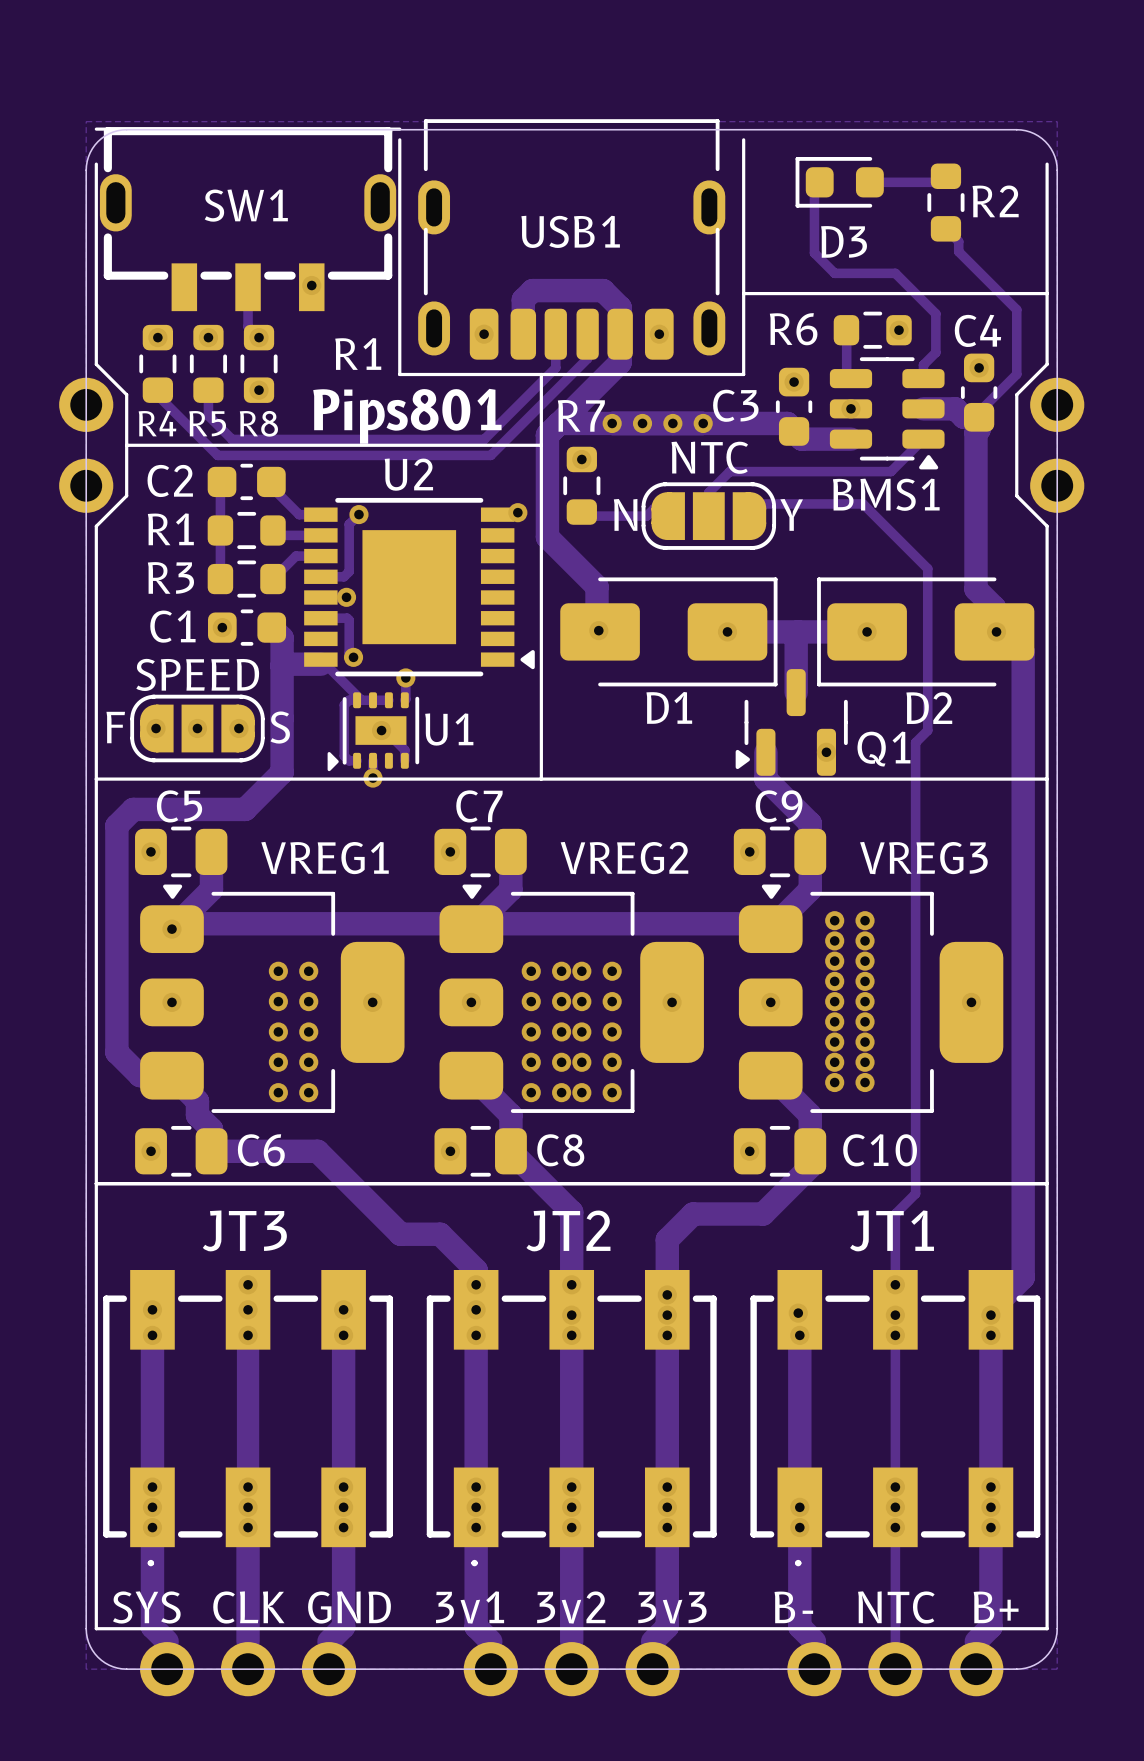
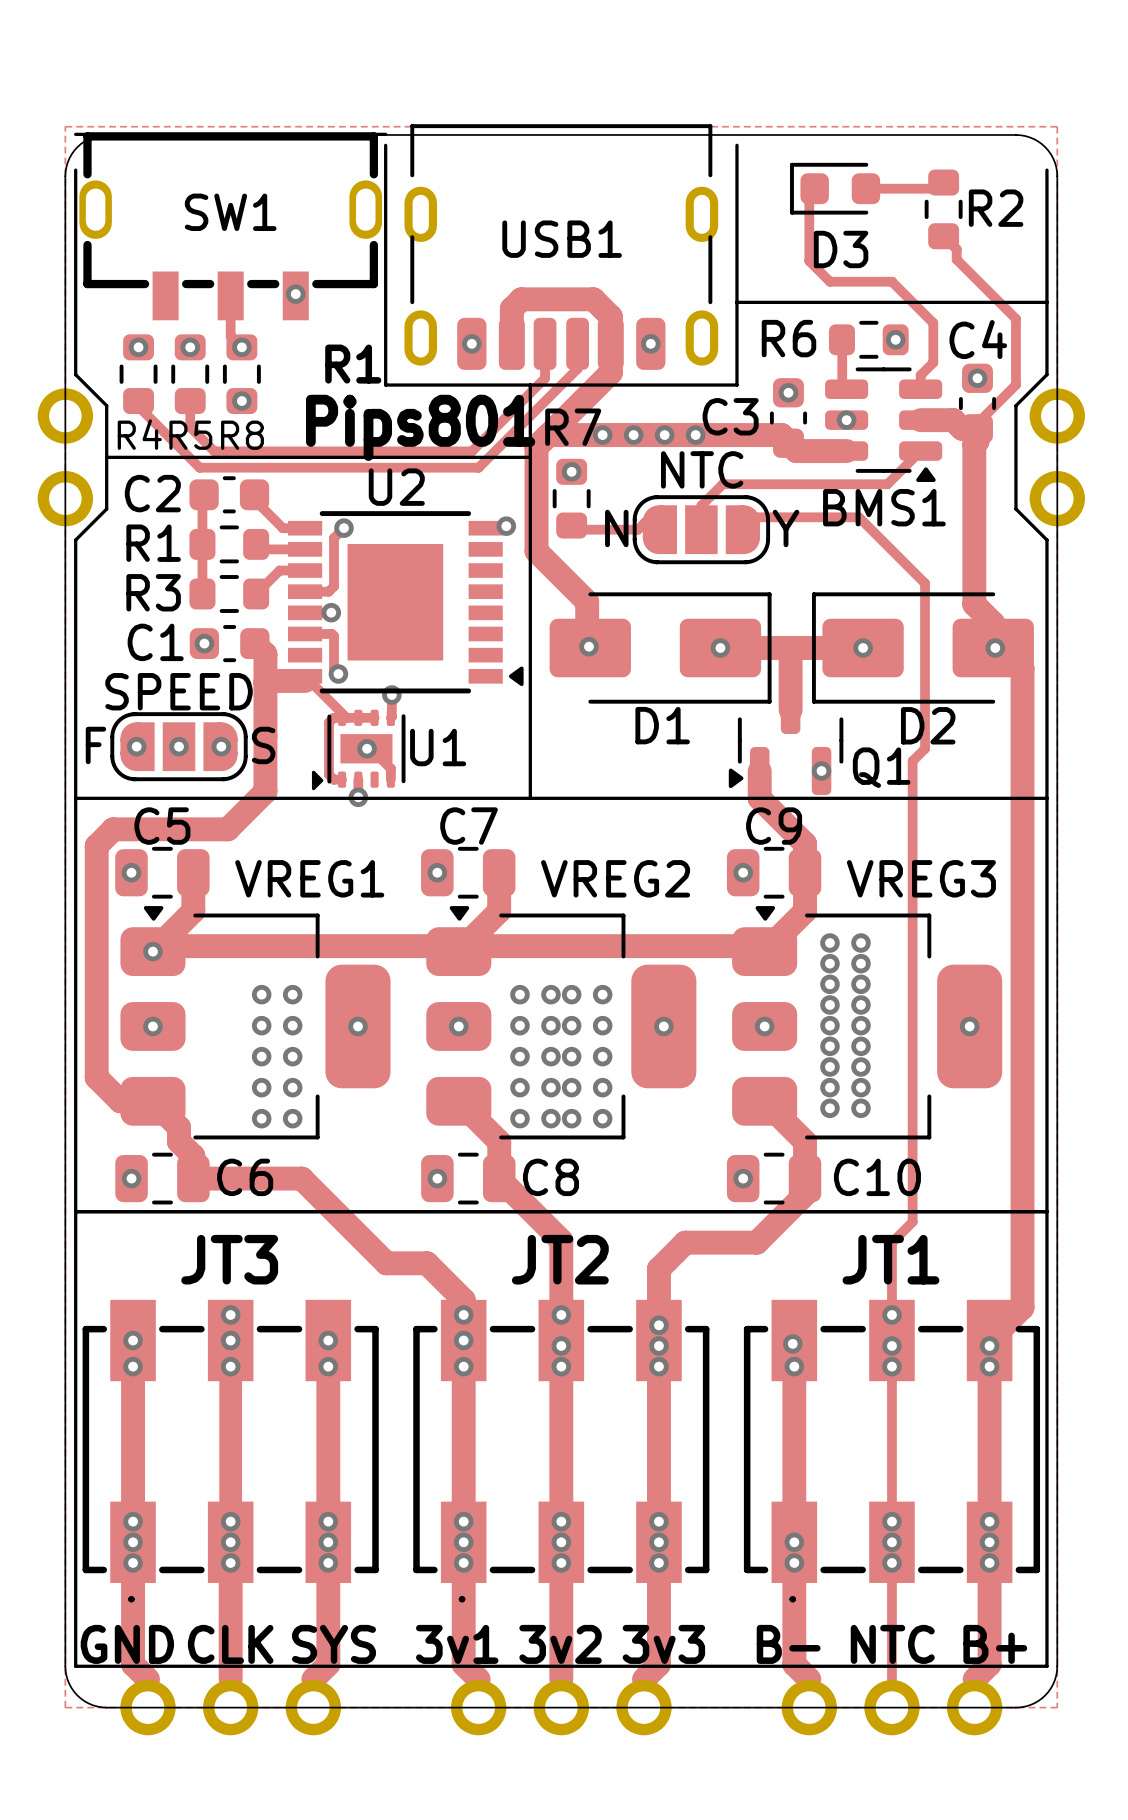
text: SYS (146, 1607) -> GND (127, 1644)
text: GND (349, 1607) -> SYS (334, 1644)

